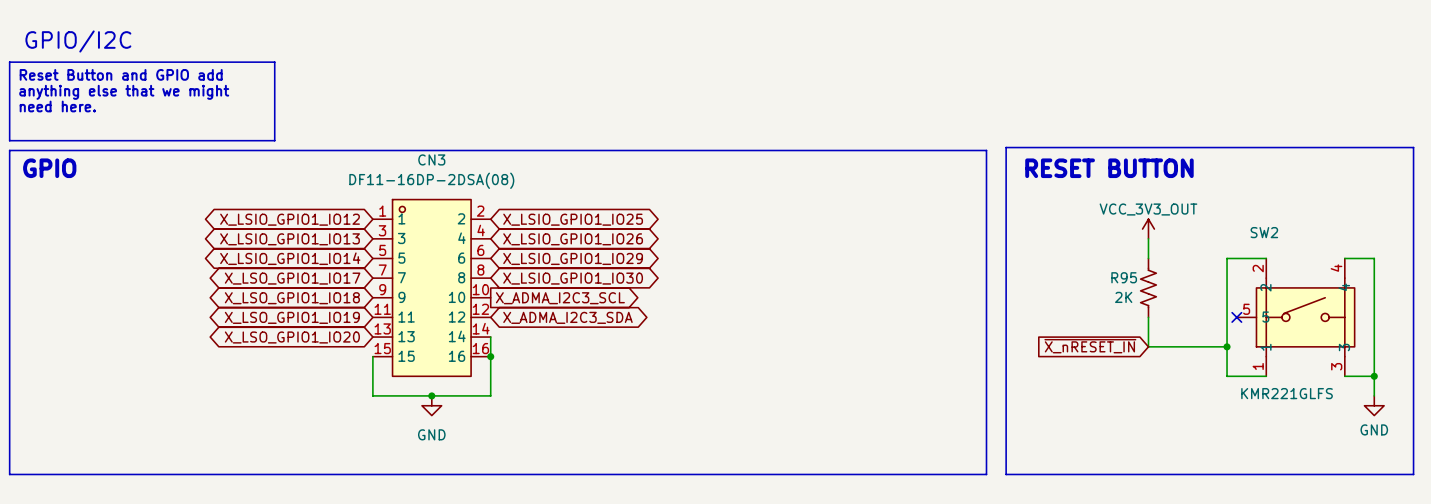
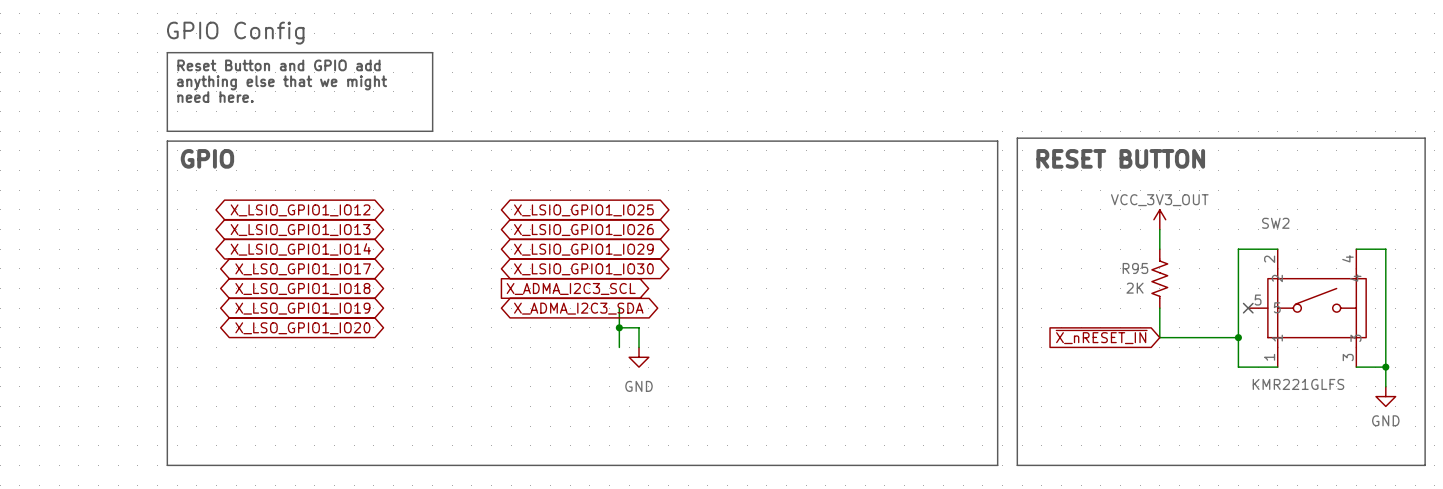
text: GPIO/I2C (78, 41) -> none
text: none -> GPIO Config (235, 33)
line: (156, 62) (9, 62) (9, 140) (156, 140) -> (167, 52) (167, 131)
line: (274, 62) (274, 140) -> (285, 52) (432, 52) (432, 131) (285, 131)
text position: Reset Button and GPIO add (121, 74) -> Reset Button and GPIO add (278, 65)
text position: anything else that we might (124, 92) -> anything else that we might (281, 82)
text position: need here. (57, 106) -> need here. (215, 97)
line: (156, 150) (9, 150) (9, 474) (156, 474) -> (167, 141) (167, 465)
text position: GPIO (49, 168) -> GPIO (207, 158)
CN3: DF11-16DP-2DSA(08) (431, 287) -> none
wire: none -> (619, 308) (619, 347)
wire: (490, 337) (490, 395) (372, 395) (372, 356) -> none
wire: none -> (619, 327) (639, 327) (639, 347)
junction: none -> (619, 327)
junction: (490, 356) -> none
power symbol: none -> GND (639, 357)
junction: (431, 395) -> none
power symbol: GND (431, 405) -> none

